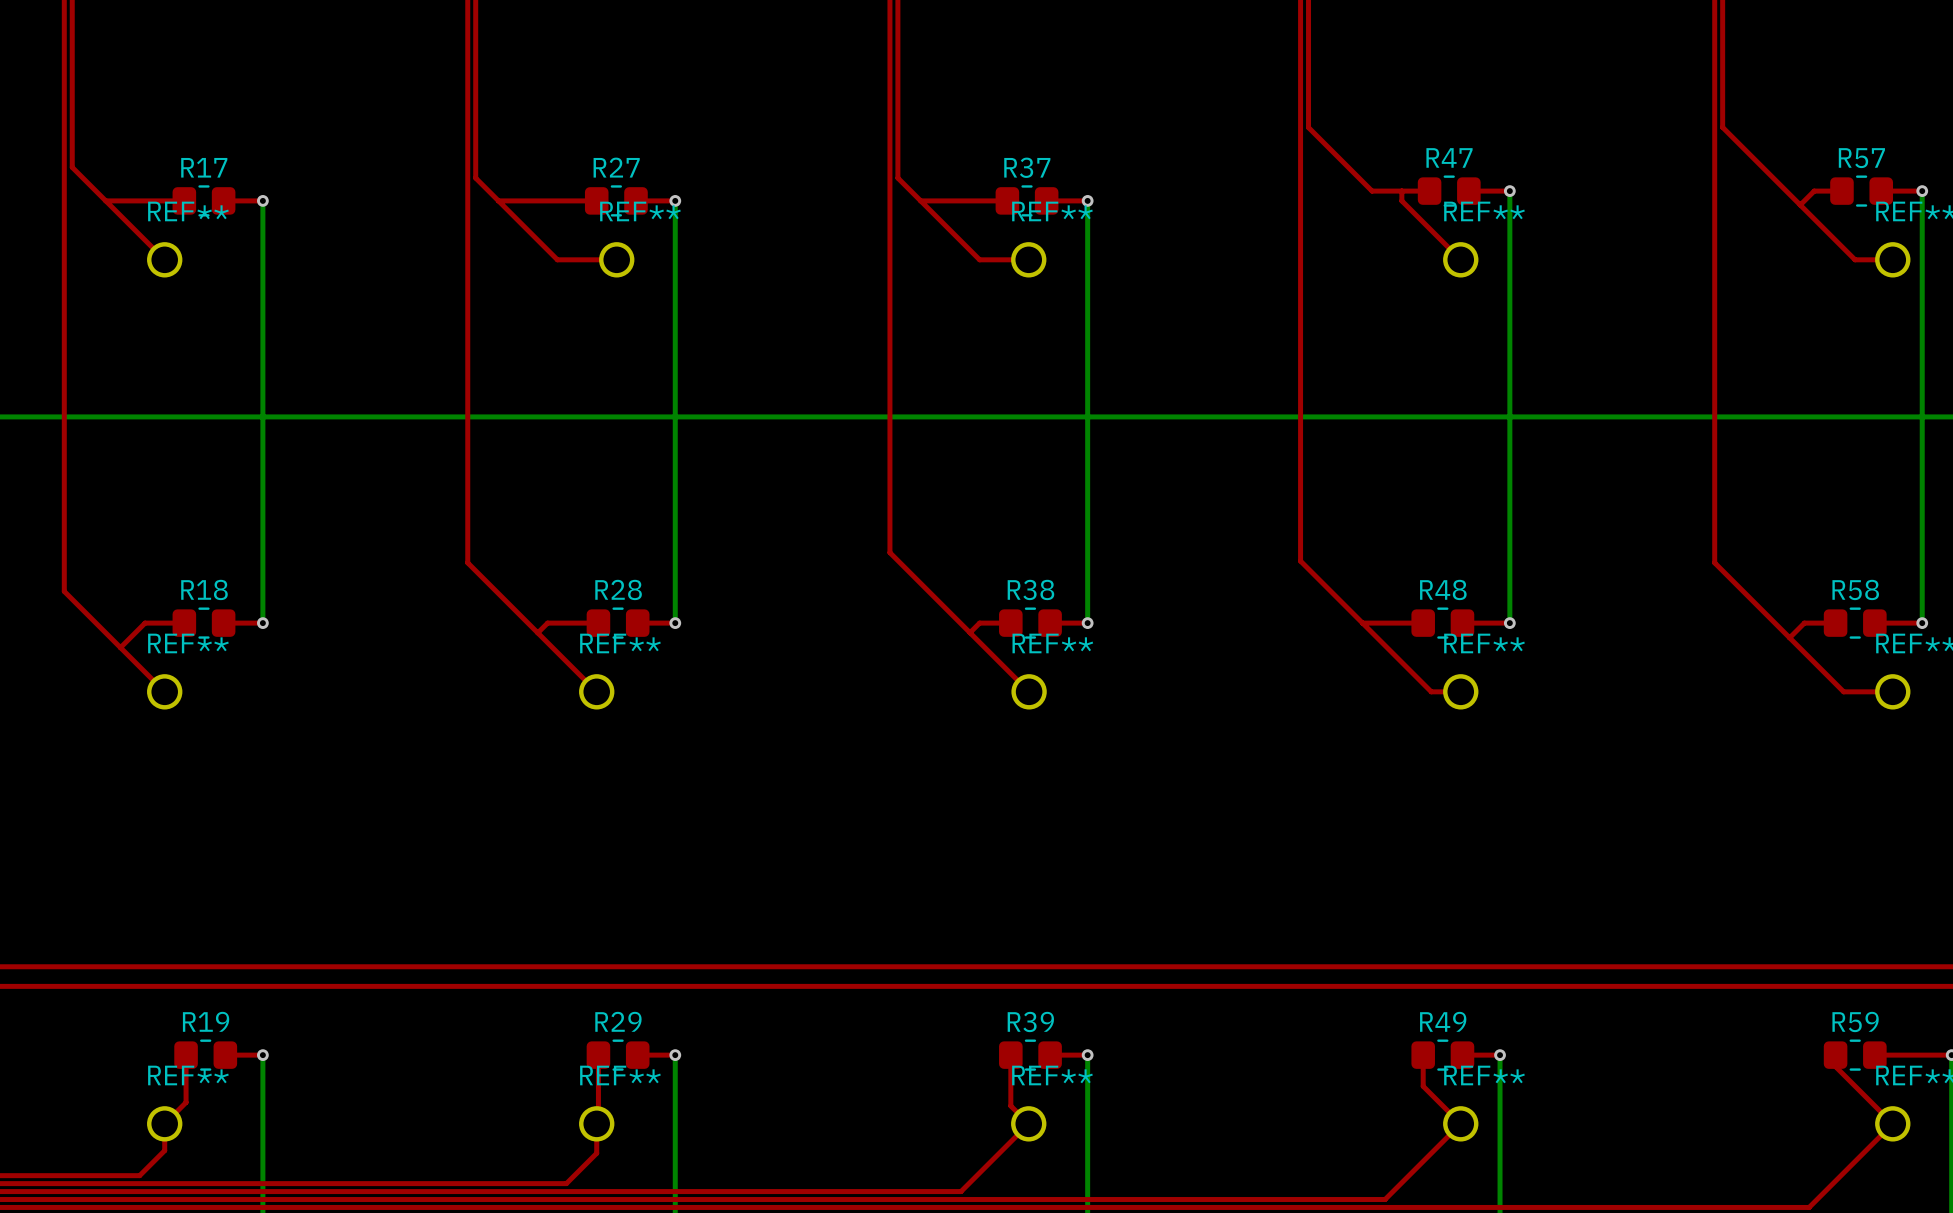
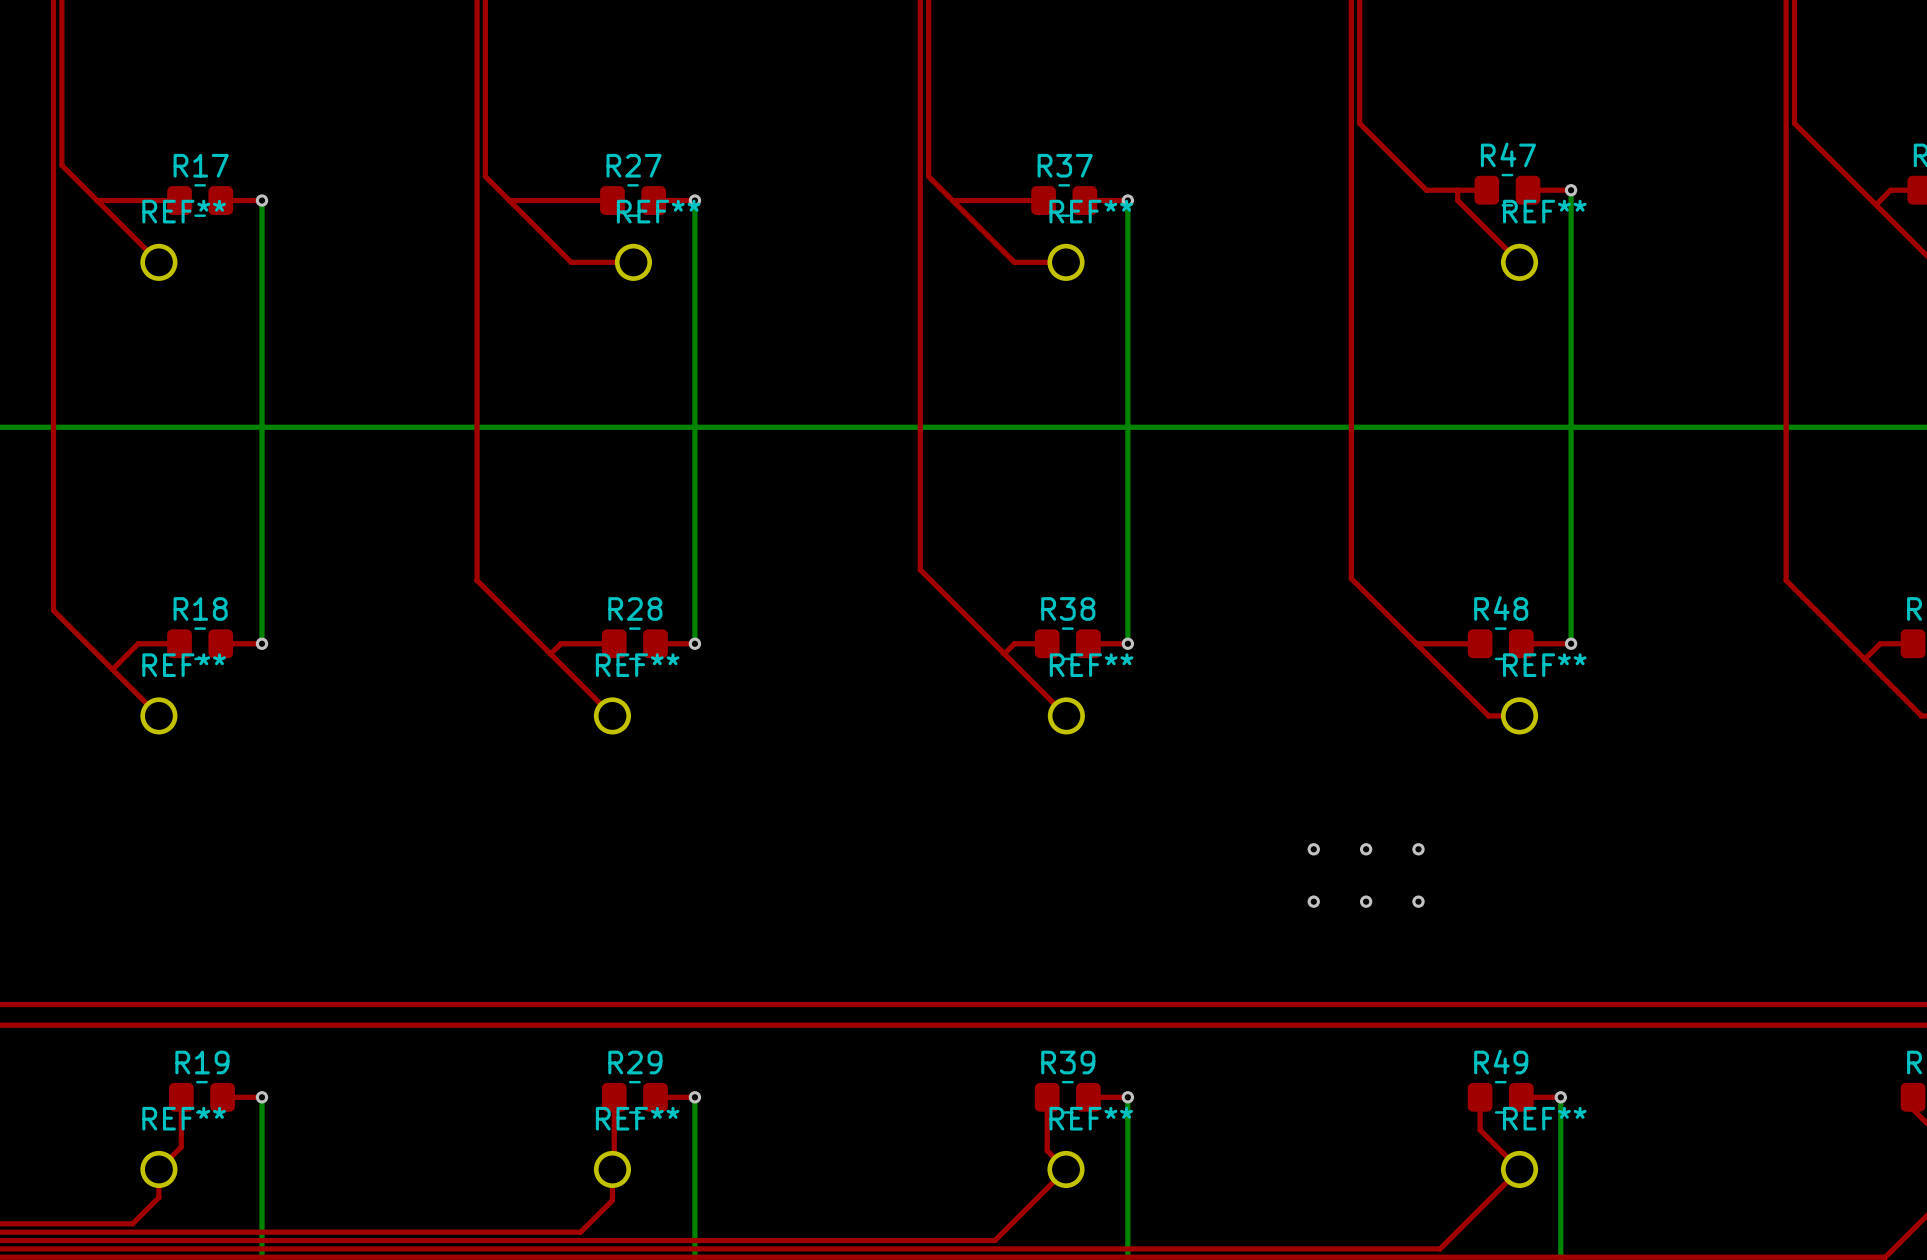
via: none -> (1313, 849)
via: none -> (1366, 849)
via: none -> (1418, 849)
via: none -> (1313, 901)
via: none -> (1366, 901)
via: none -> (1418, 901)

